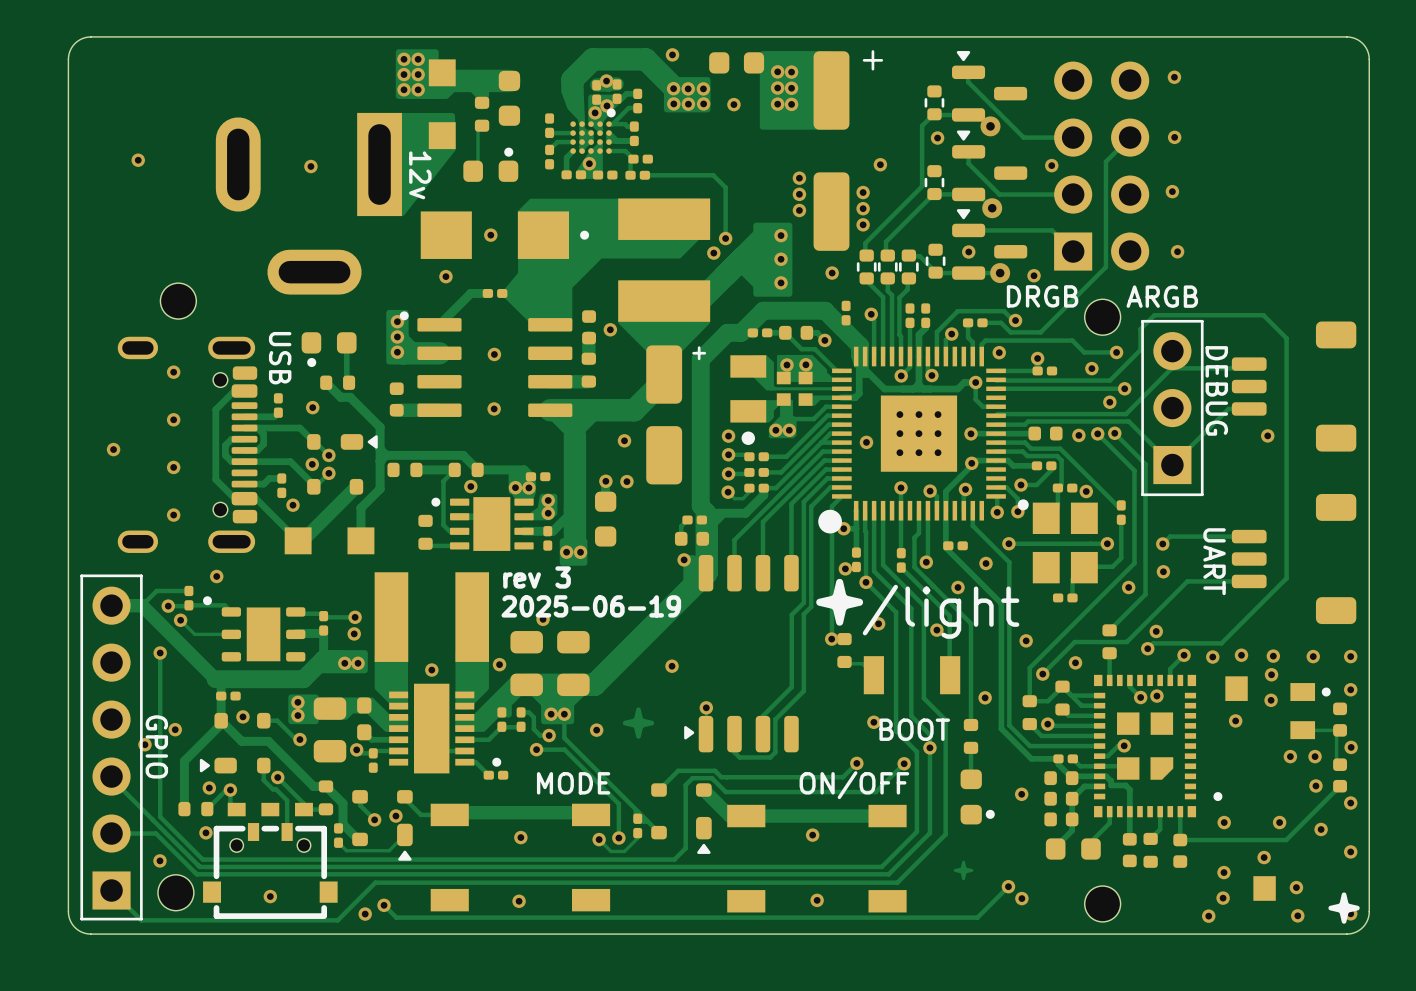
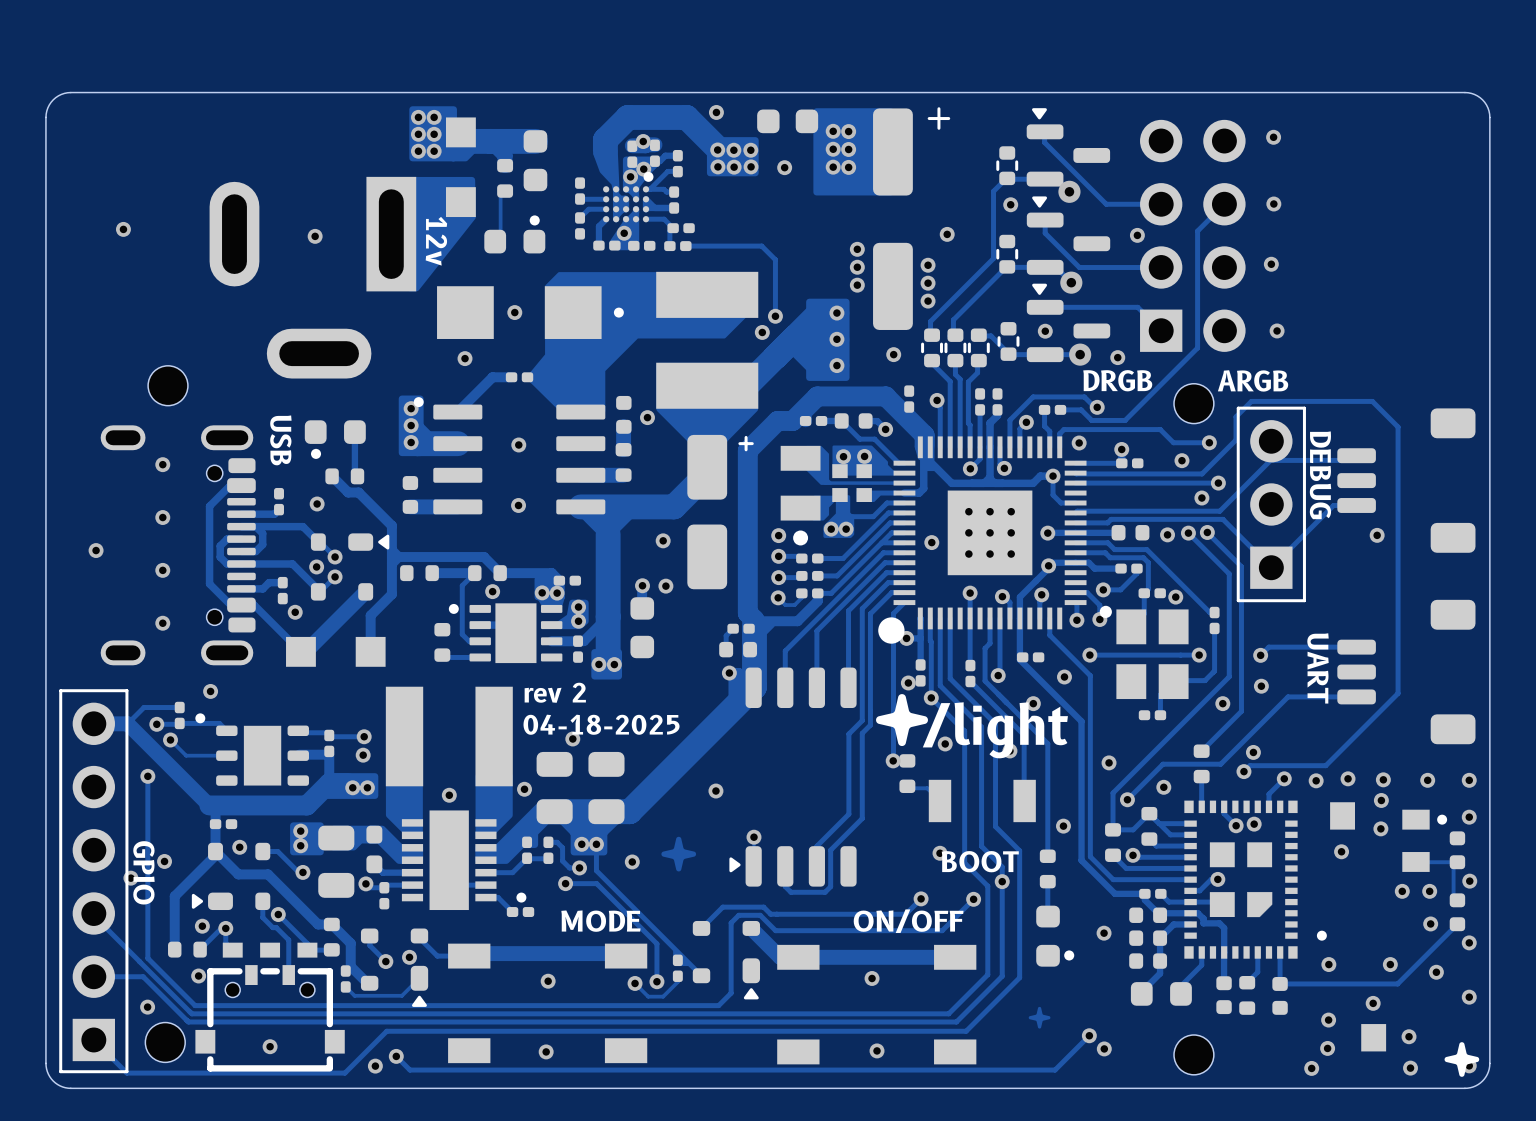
text: rev 3 (537, 577) -> rev 2 (555, 692)
text: 2025-06-19 (591, 606) -> 04-18-2025 (601, 724)

